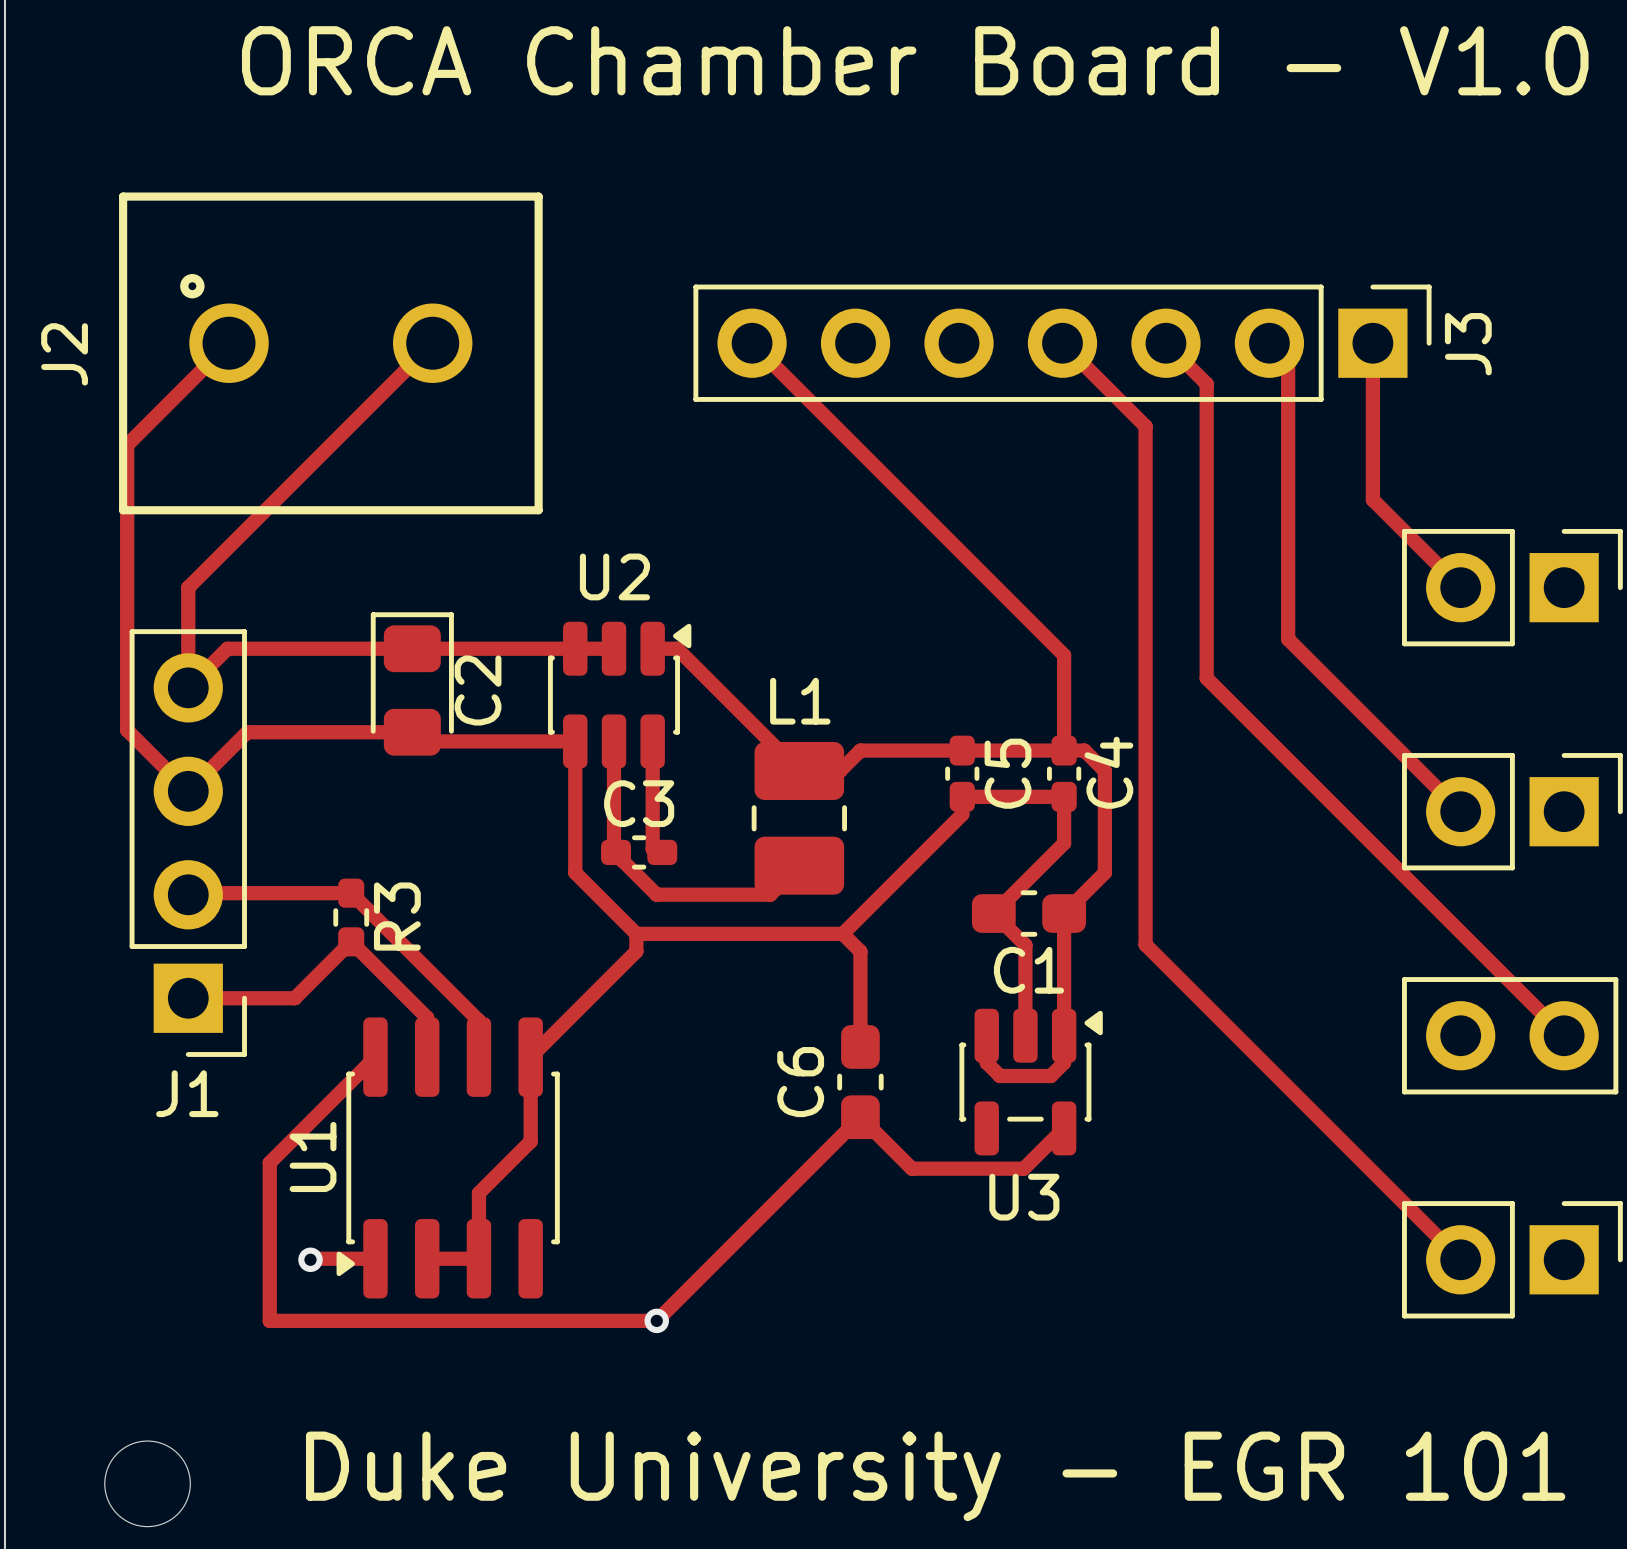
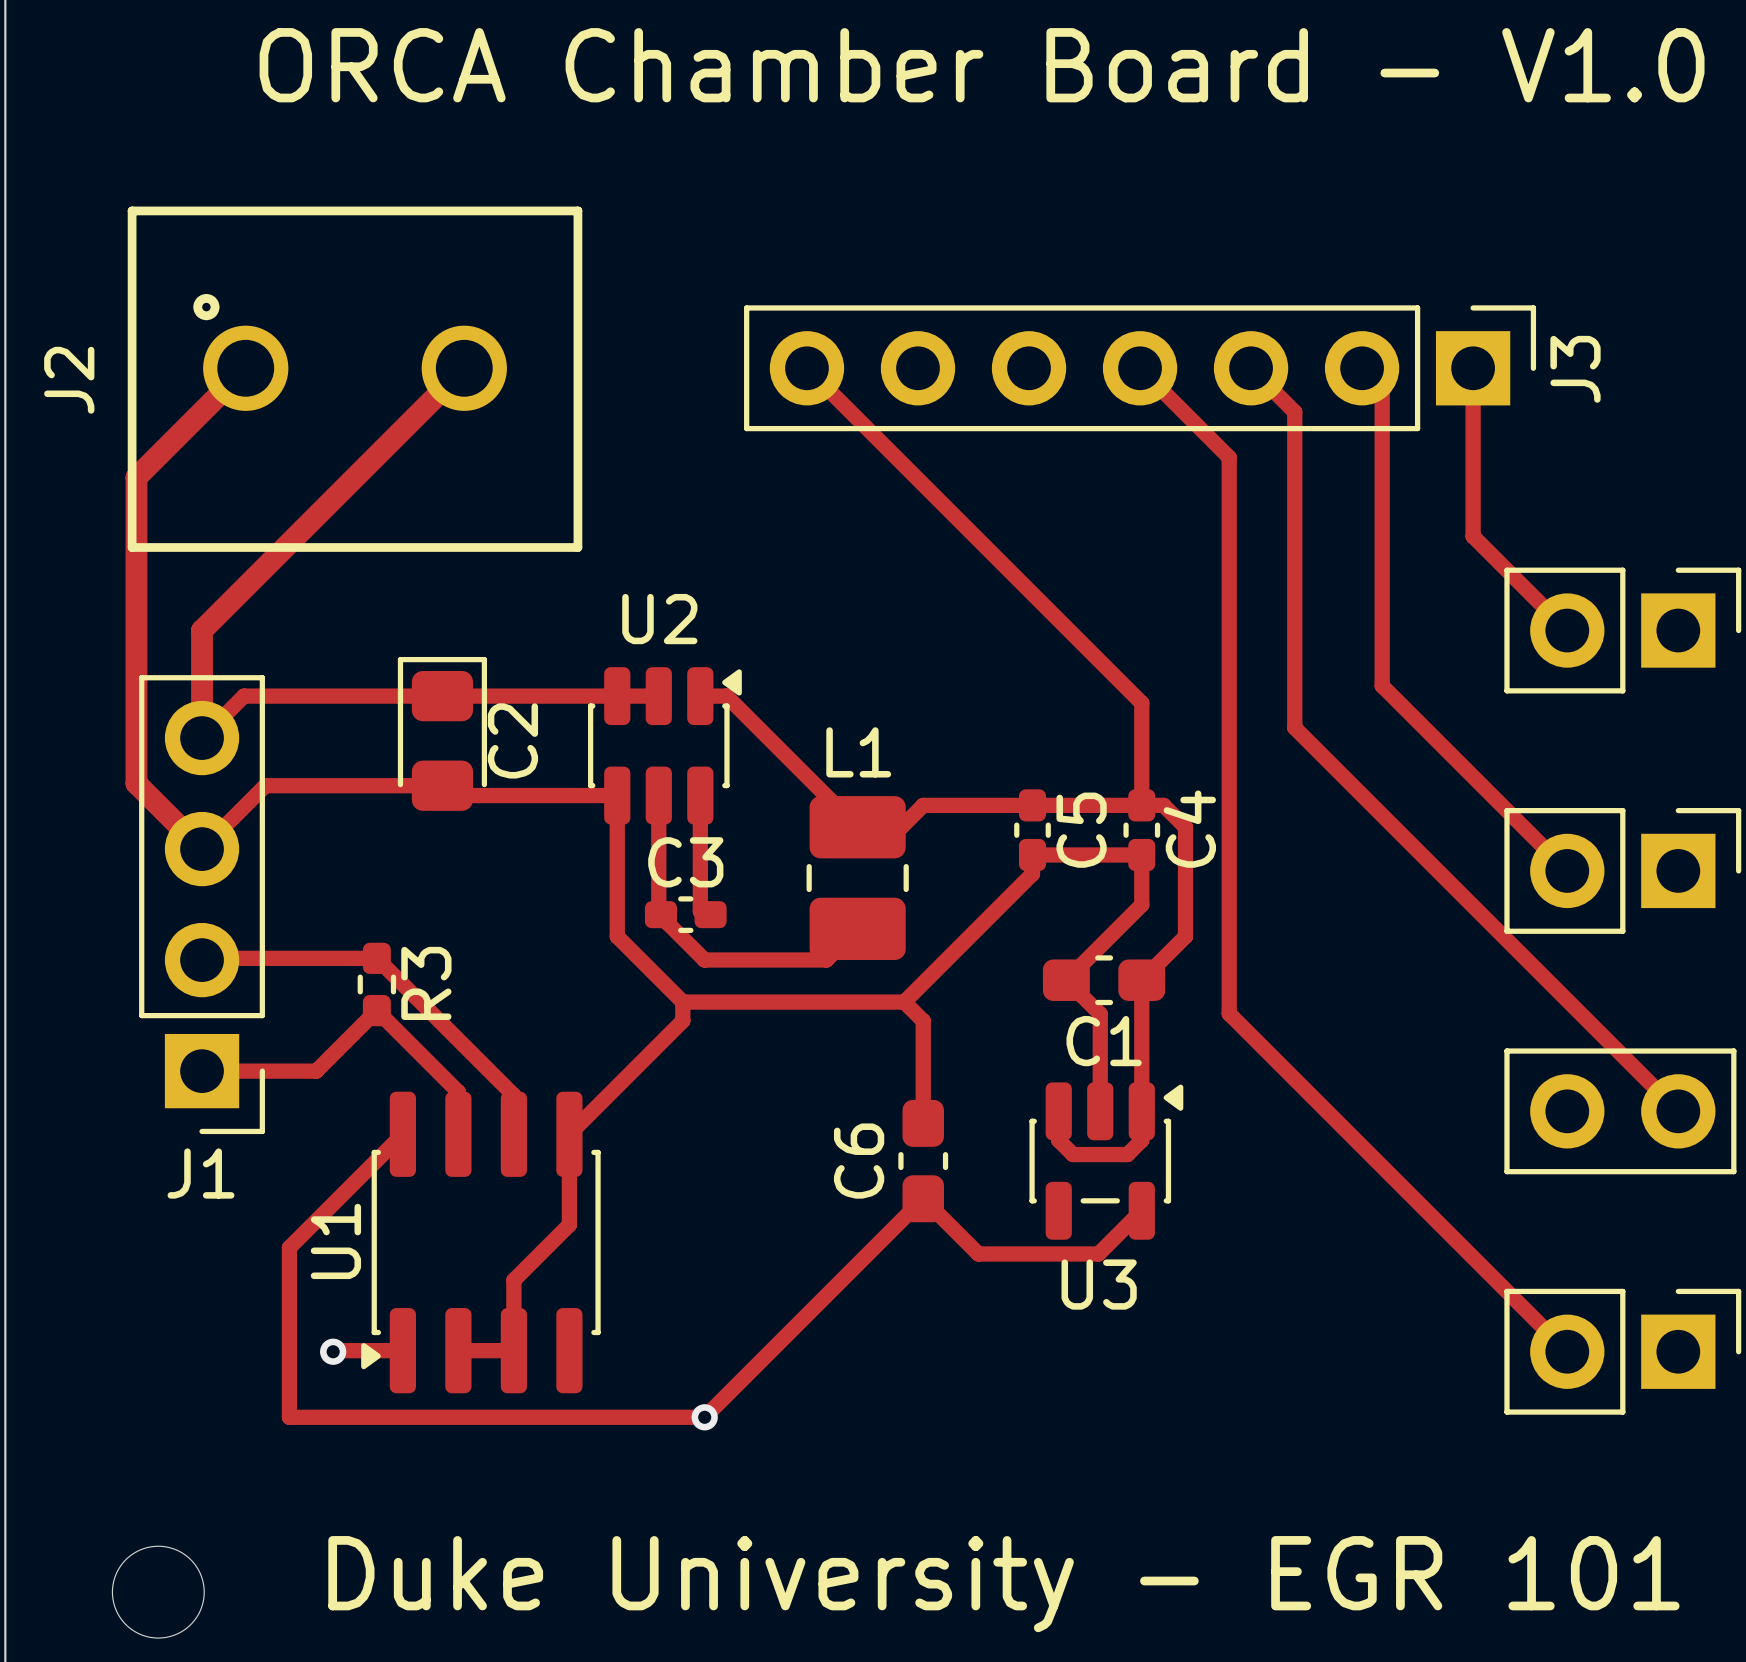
track width: thin (229, 343) (127, 445) (127, 730) (188, 791) -> thick (245, 368) (136, 477) (136, 783) (202, 849)
track width: thin (432, 343) (188, 587) (188, 687) -> thick (464, 368) (202, 630) (202, 738)

